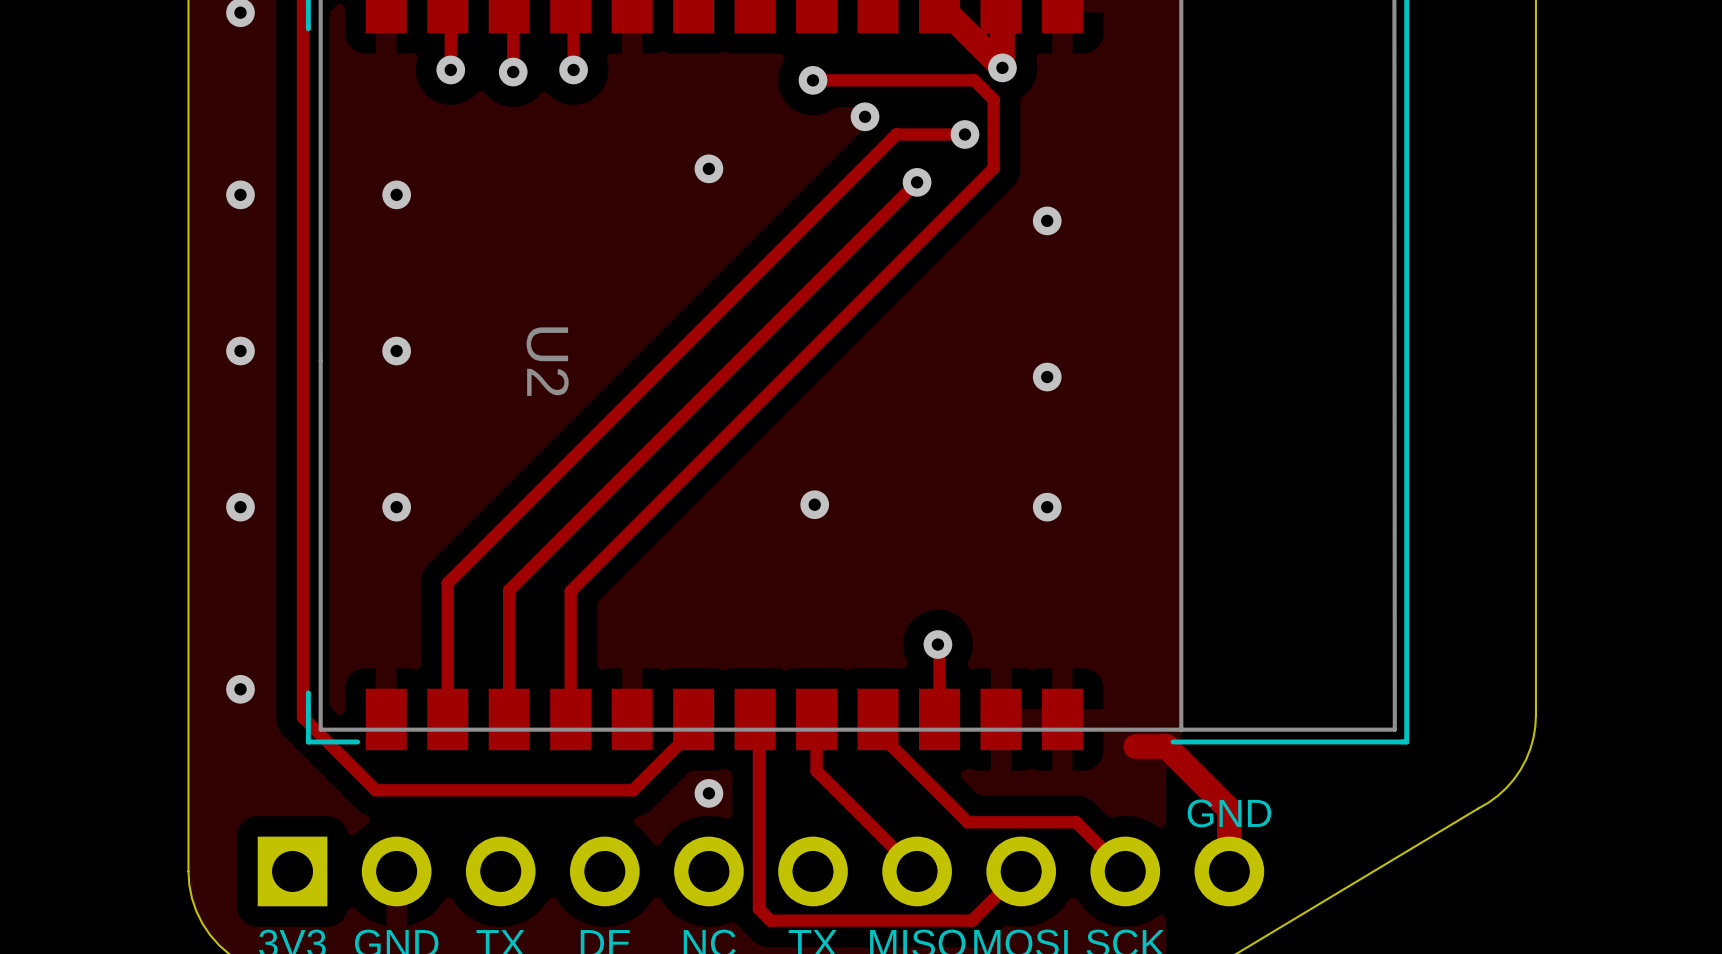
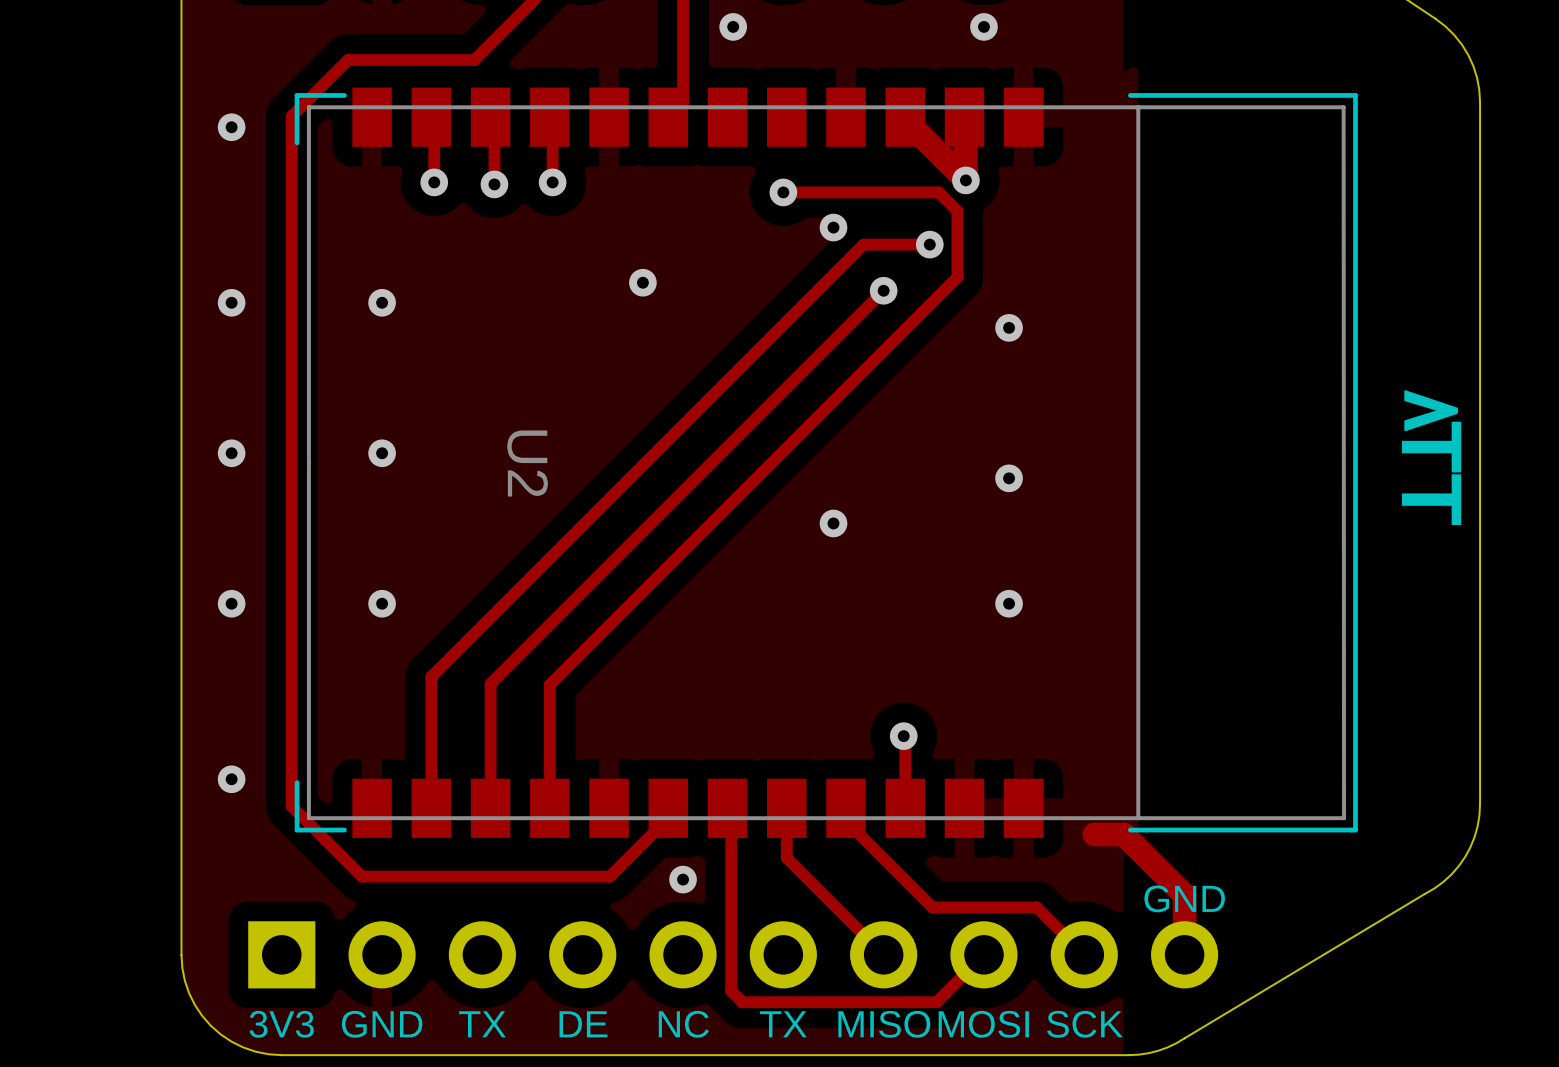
via position: (708, 168) -> (642, 282)
drawing: none -> [1404, 390, 1459, 432]
text: none -> TT (1431, 473)
via position: (814, 504) -> (833, 523)

